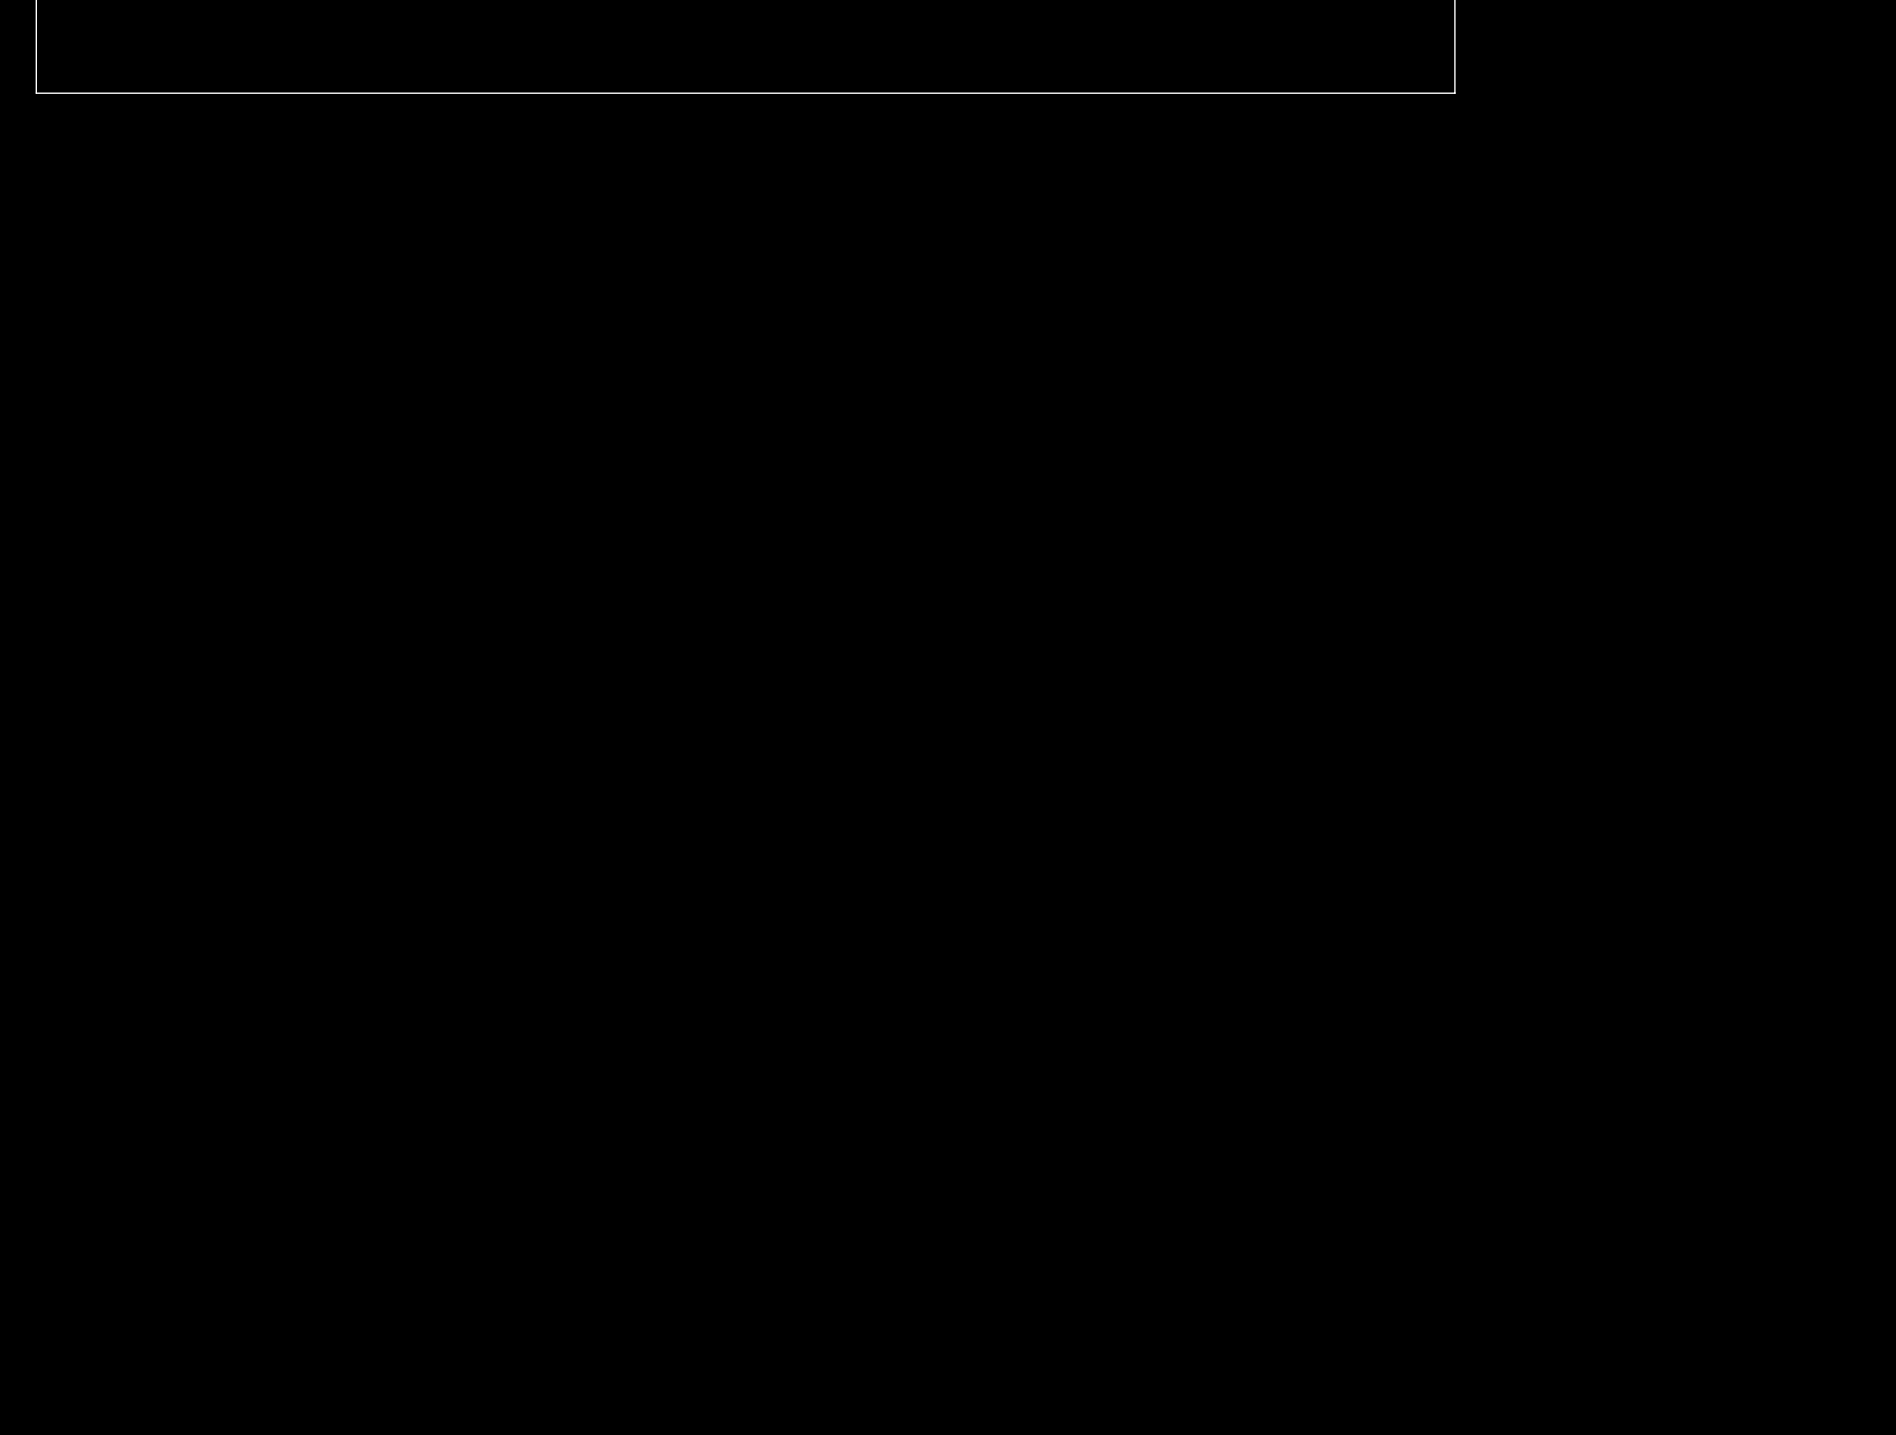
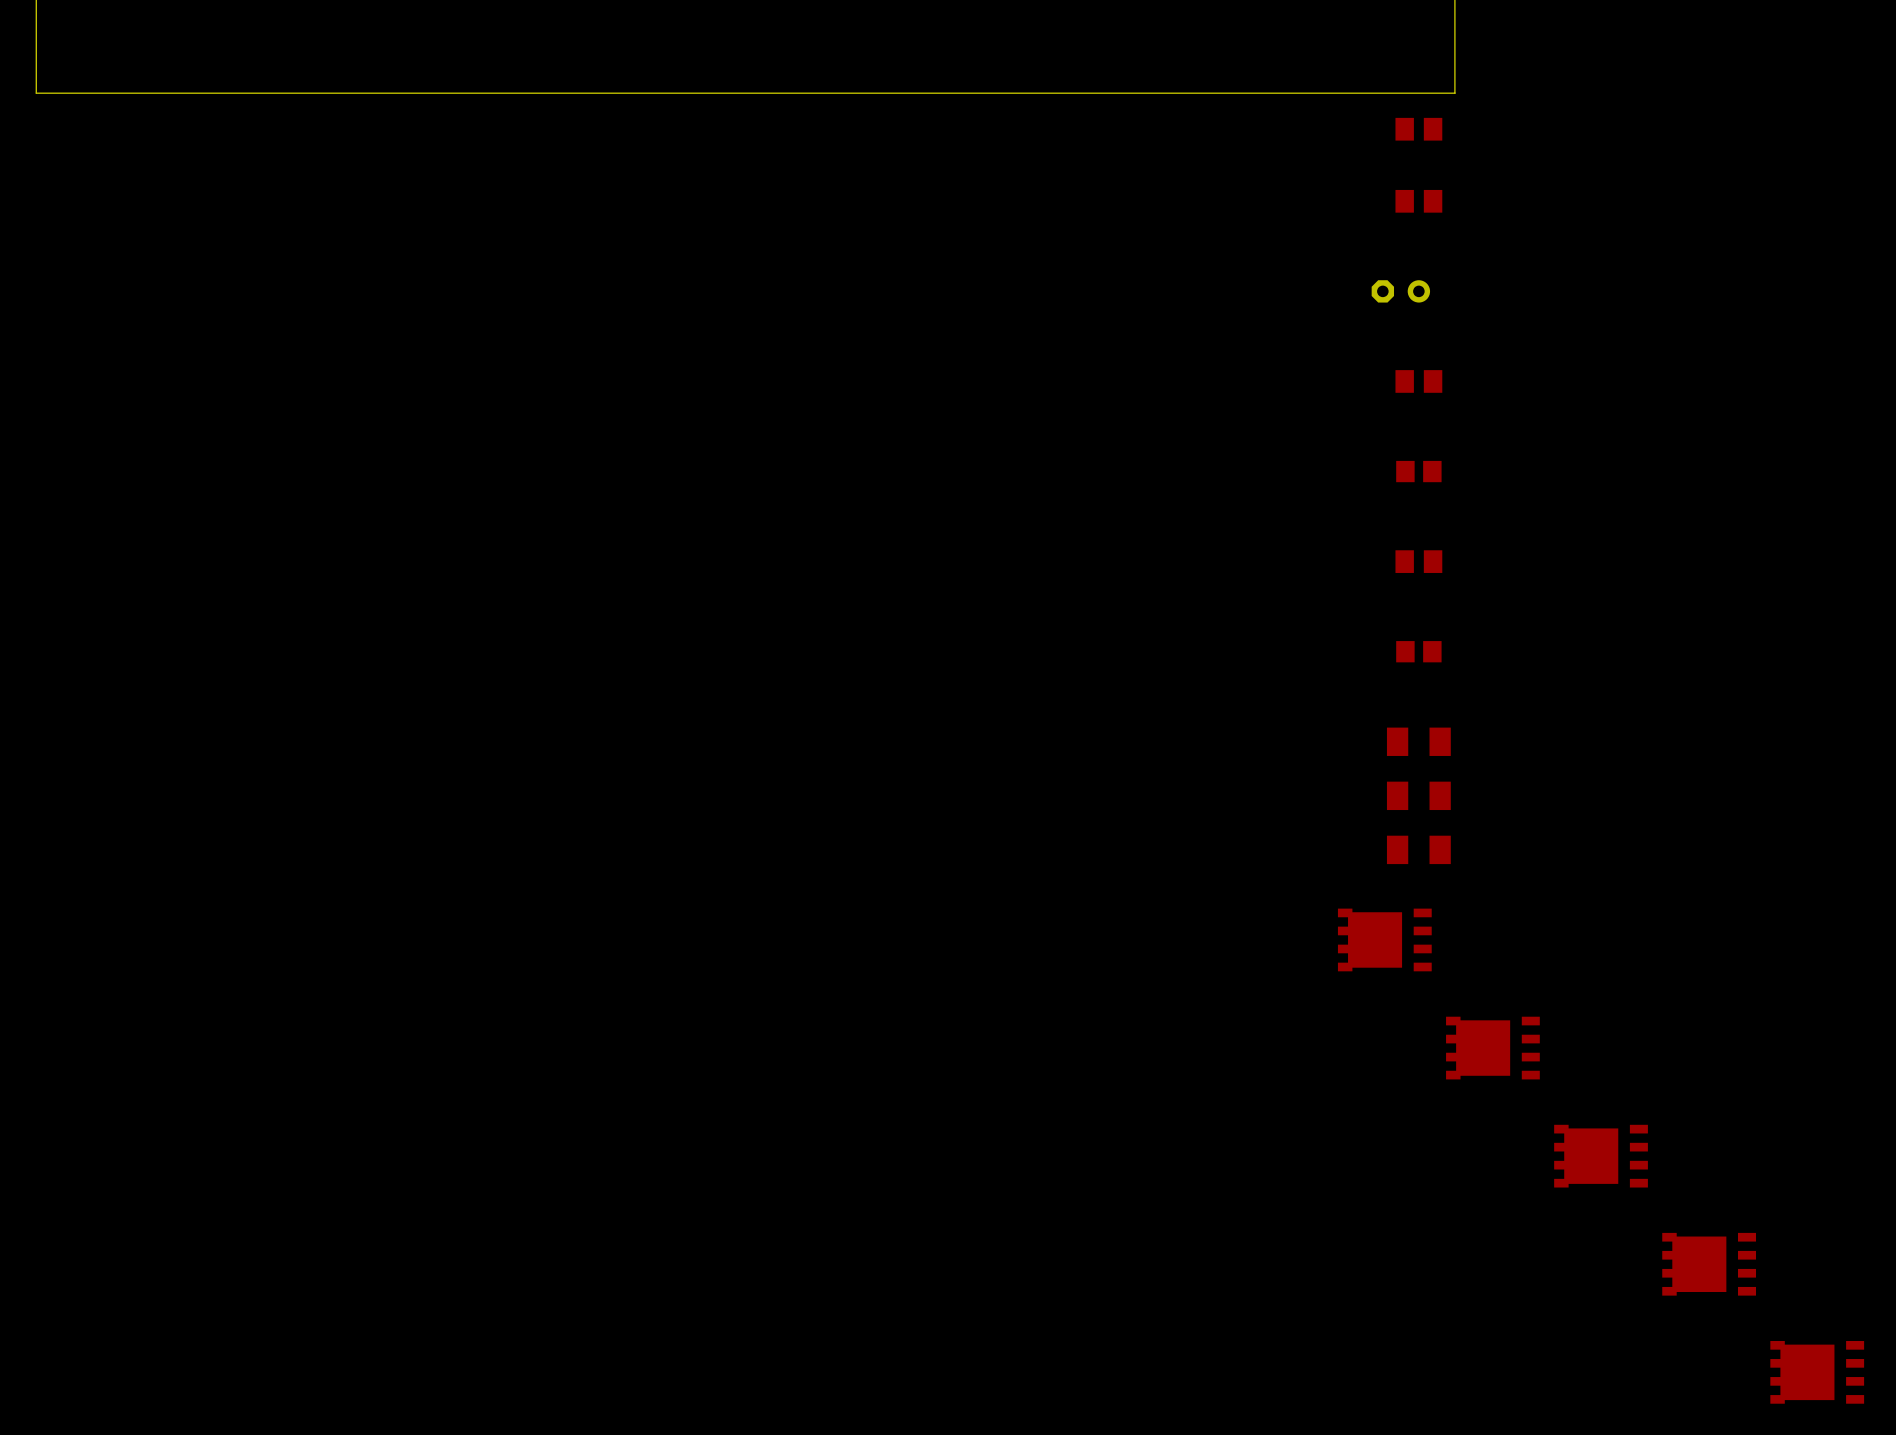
part: none -> (1418, 129)
part: none -> (1418, 201)
part: none -> (1400, 291)
part: none -> (1418, 381)
part: none -> (1418, 471)
part: none -> (1418, 561)
part: none -> (1418, 651)
part: none -> (1418, 741)
part: none -> (1418, 795)
part: none -> (1418, 849)
part: none -> (1384, 939)
part: none -> (1492, 1048)
part: none -> (1601, 1156)
part: none -> (1709, 1264)
part: none -> (1817, 1372)

